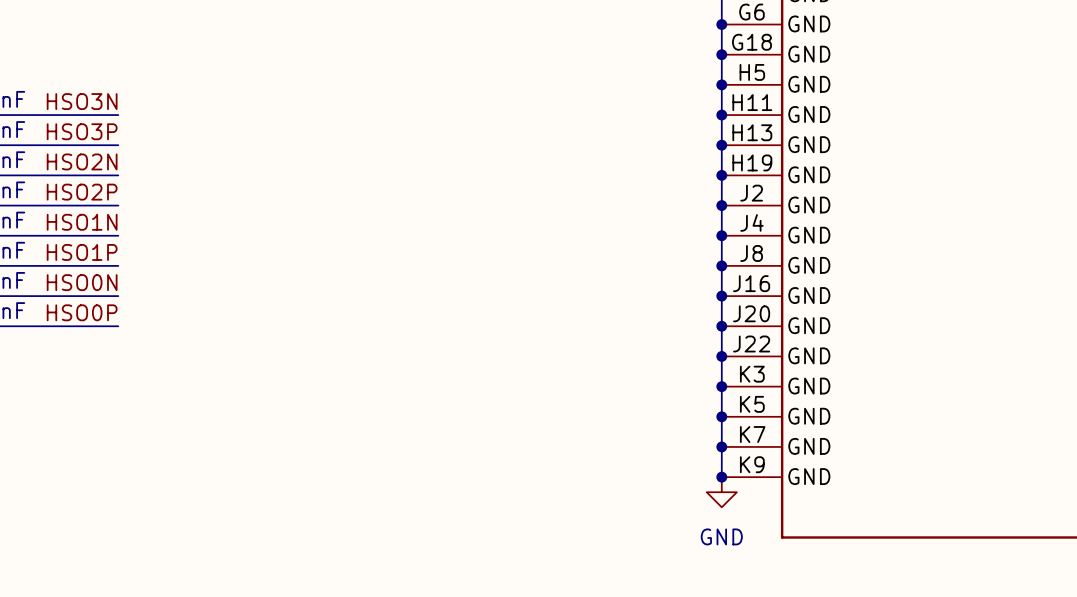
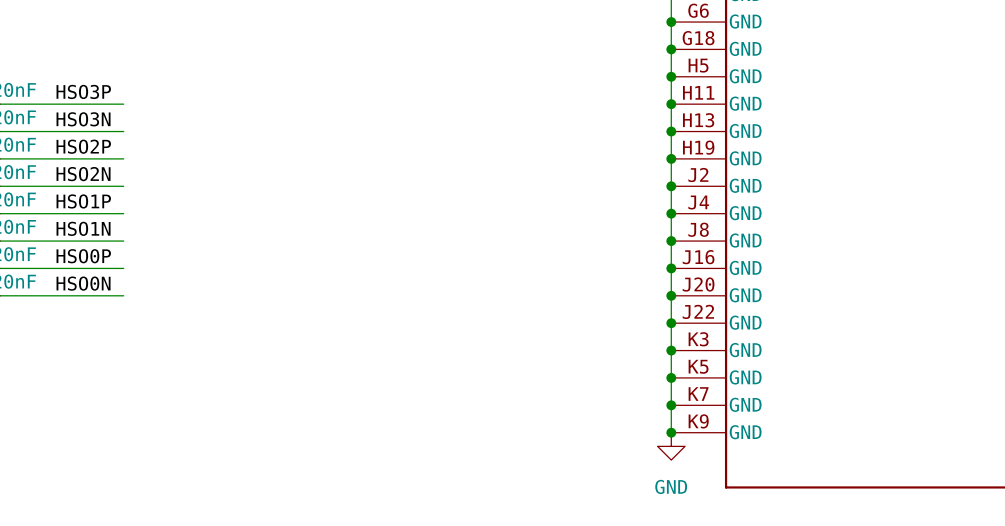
label: HSO3N (82, 101) -> HSO3P (83, 91)
label: HSO3P (82, 131) -> HSO3N (83, 119)
label: HSO2N (82, 161) -> HSO2P (83, 146)
label: HSO2P (82, 192) -> HSO2N (83, 174)
label: HSO1N (82, 222) -> HSO1P (83, 201)
label: HSO1P (82, 252) -> HSO1N (83, 228)
label: HSO0N (82, 282) -> HSO0P (83, 256)
label: HSO0P (82, 312) -> HSO0N (83, 283)

